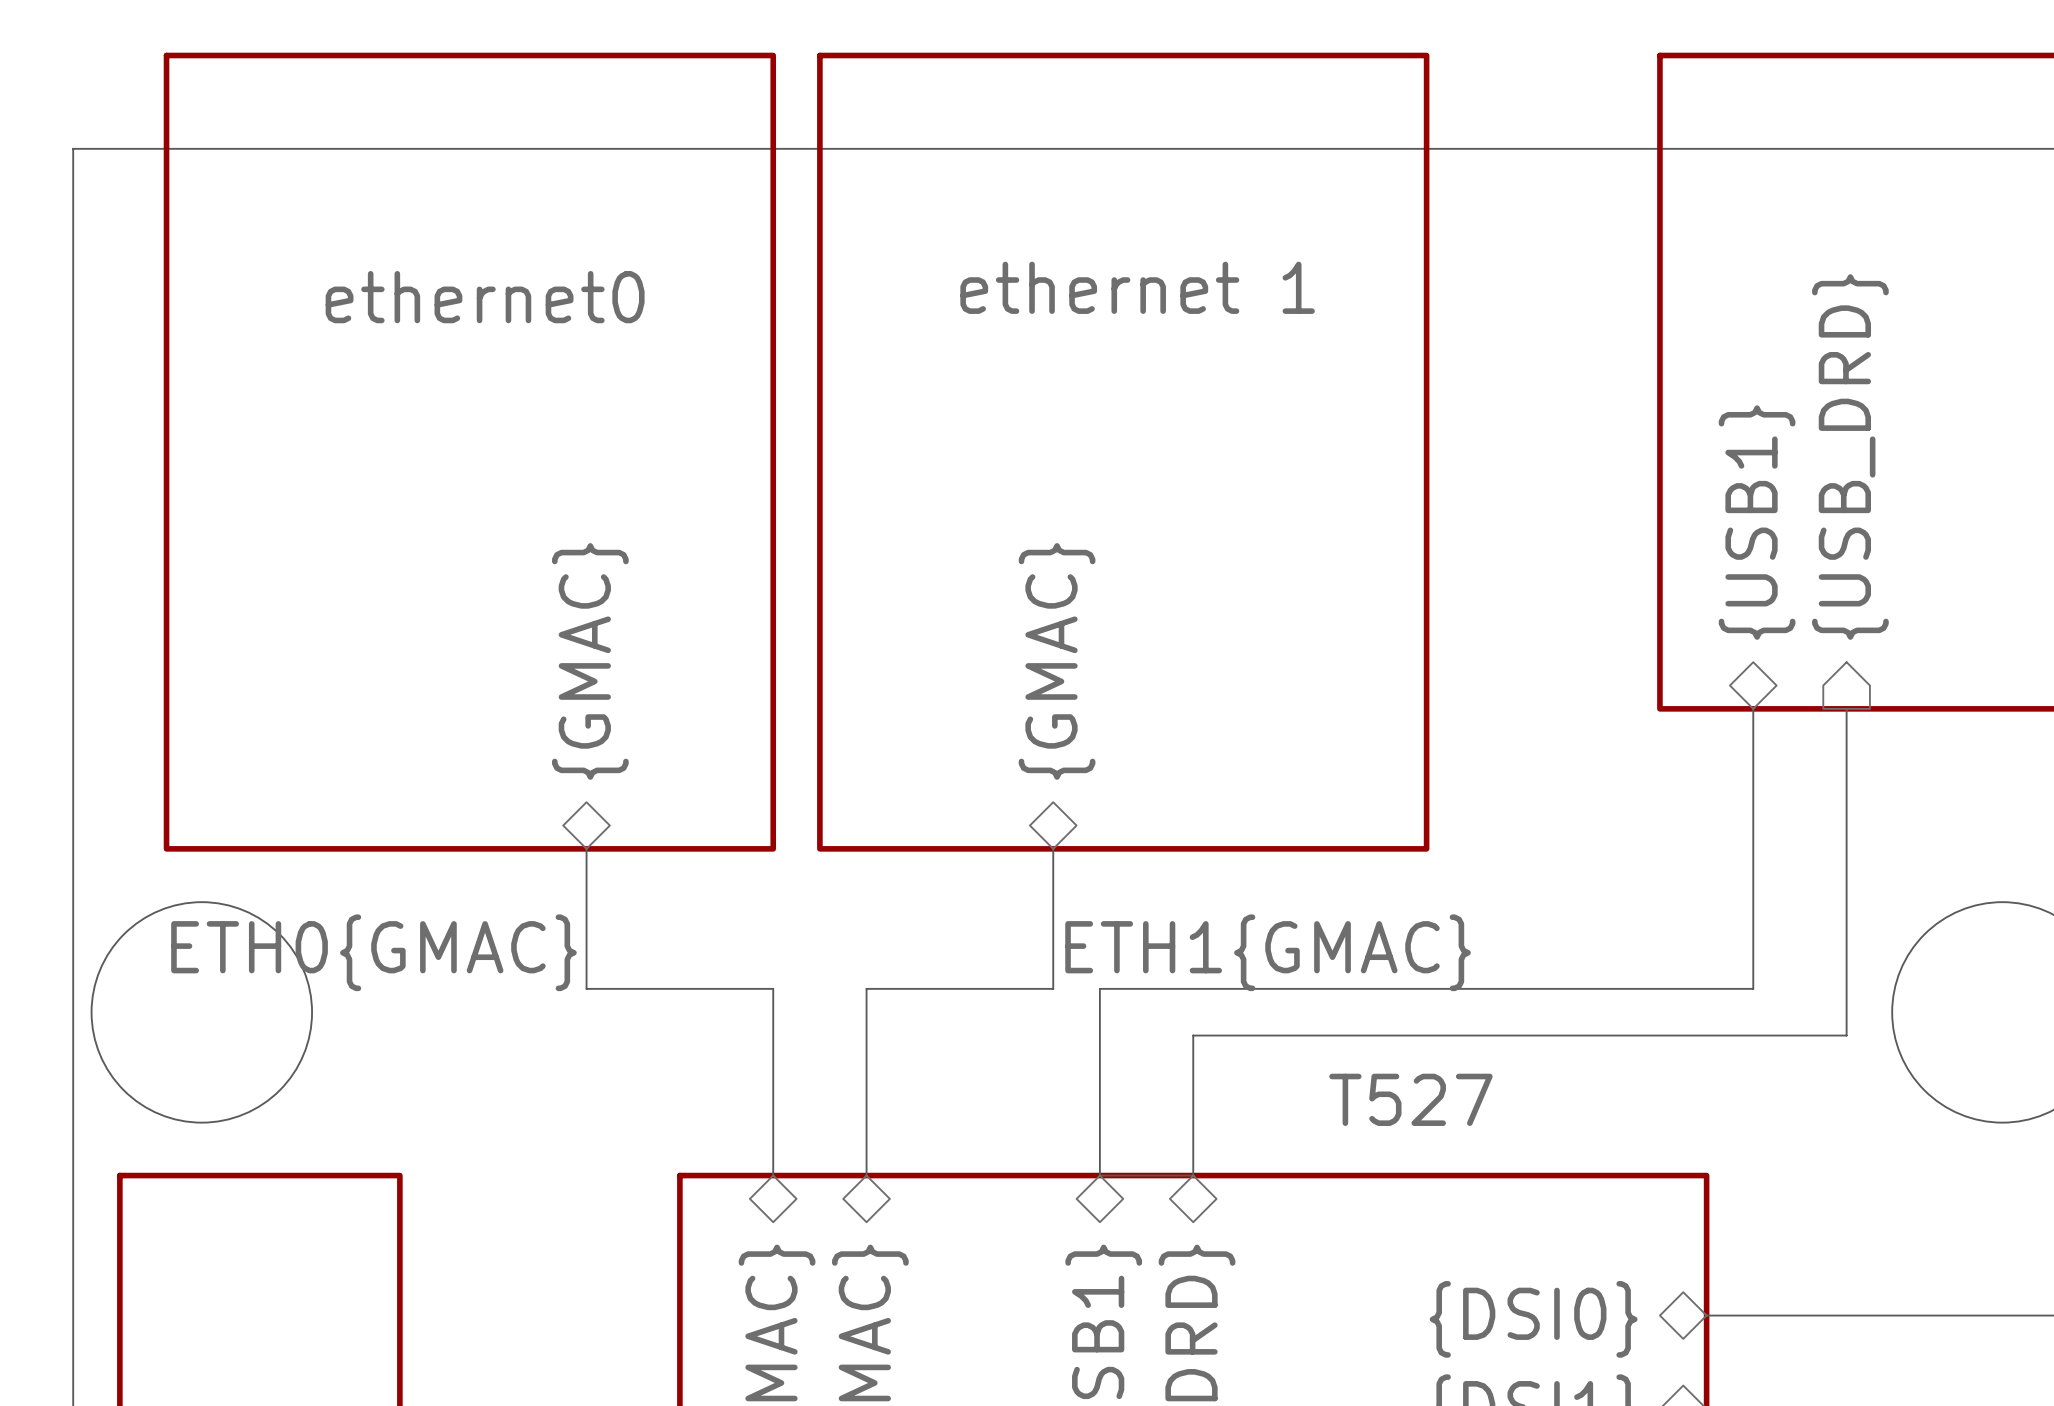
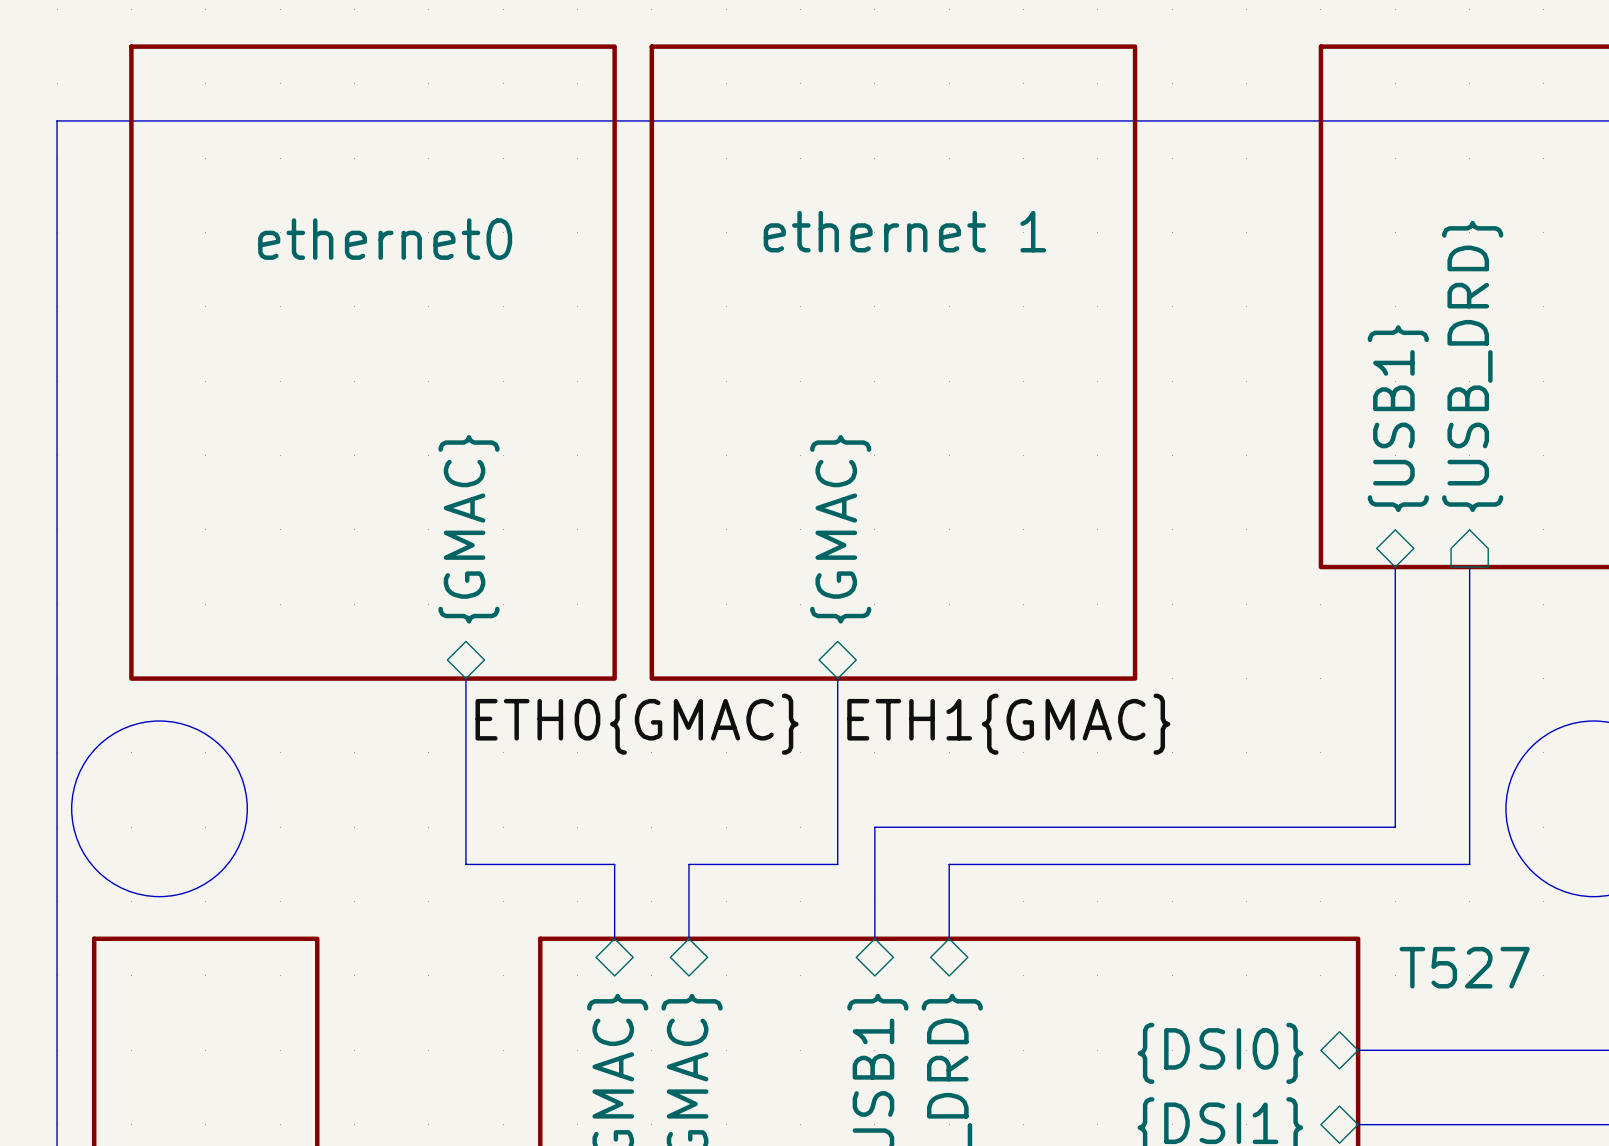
label position: ETH0{GMAC} (373, 952) -> ETH0{GMAC} (637, 724)
label position: ETH1{GMAC} (1268, 952) -> ETH1{GMAC} (1008, 724)
bus: (586, 988) (773, 988) (773, 1082) -> (465, 790) (465, 864) (614, 864)
bus: (1053, 988) (866, 988) (866, 1082) -> (837, 790) (837, 864) (688, 864)
bus: (1753, 988) (1099, 988) (1099, 1035) -> none
bus: (1193, 1035) (1193, 1082) -> (949, 827) (874, 827)
bus: (1753, 1035) (1846, 1035) -> (1395, 827) (1395, 790)
bus: none -> (1469, 827) (1469, 864) (949, 864)
sheet T527 name position: T527 (1410, 1099) -> T527 (1464, 967)
bus: (1099, 1175) (1193, 1175) -> none

